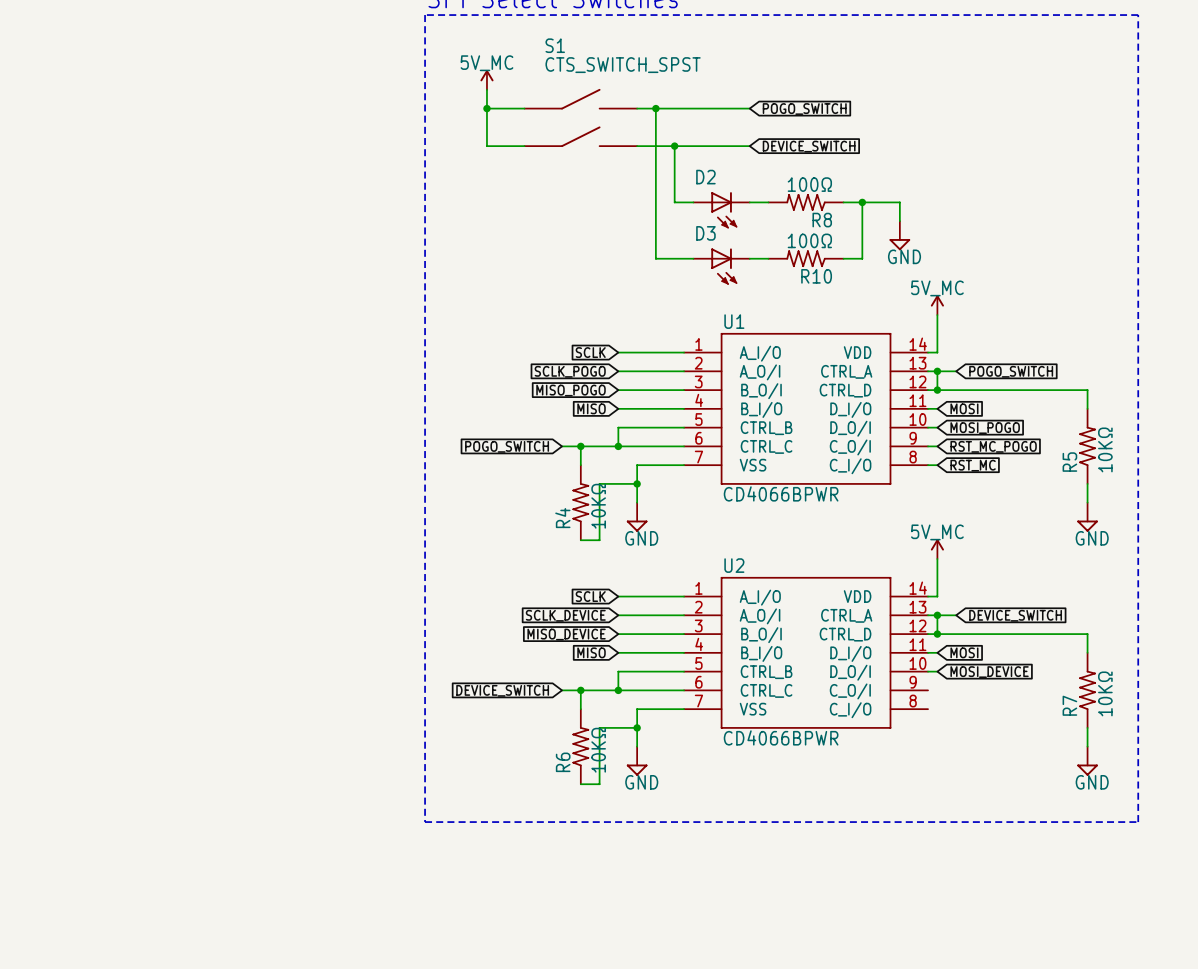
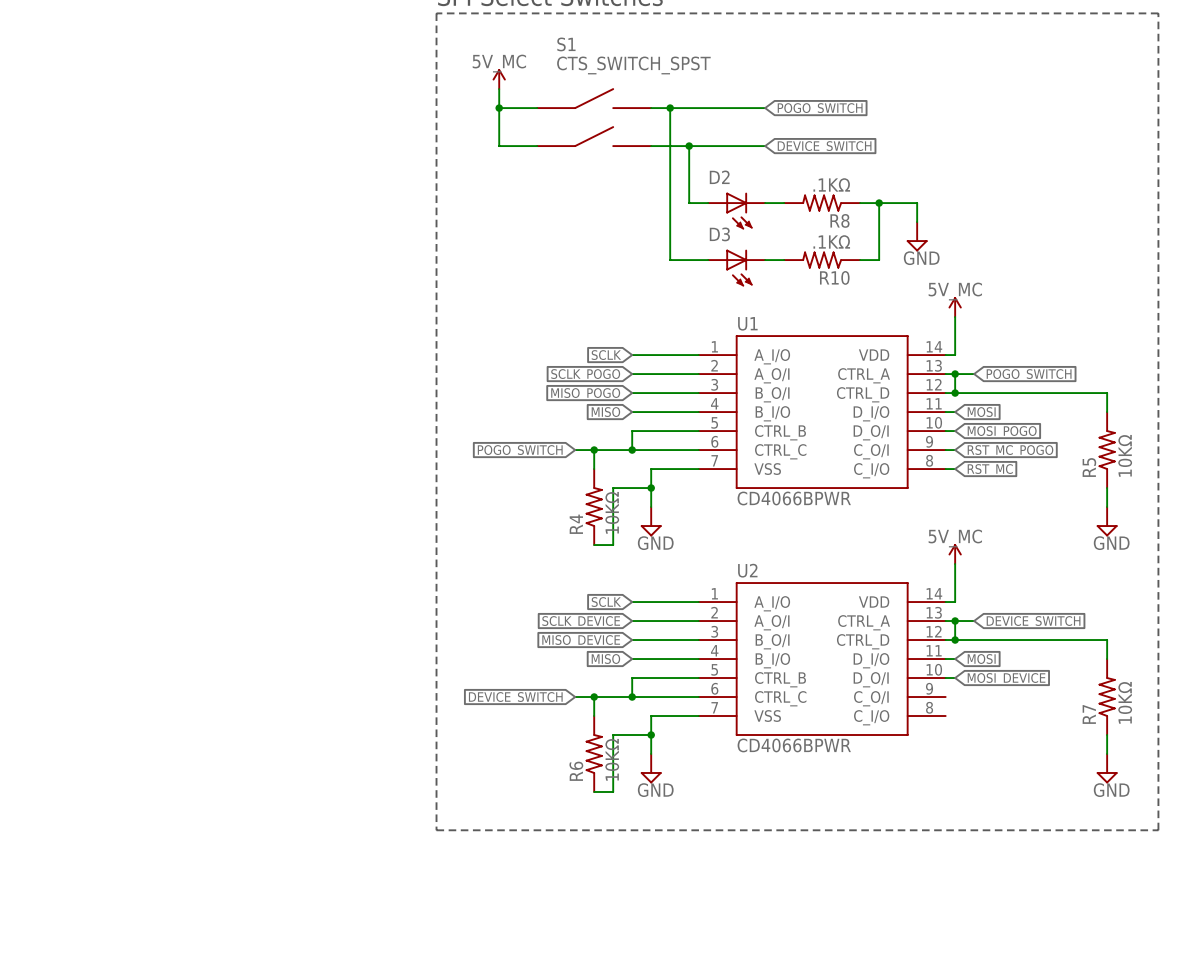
R8 value: 100Ω (809, 184) -> .1KΩ (831, 184)
R10 value: 100Ω (809, 240) -> .1KΩ (831, 241)

